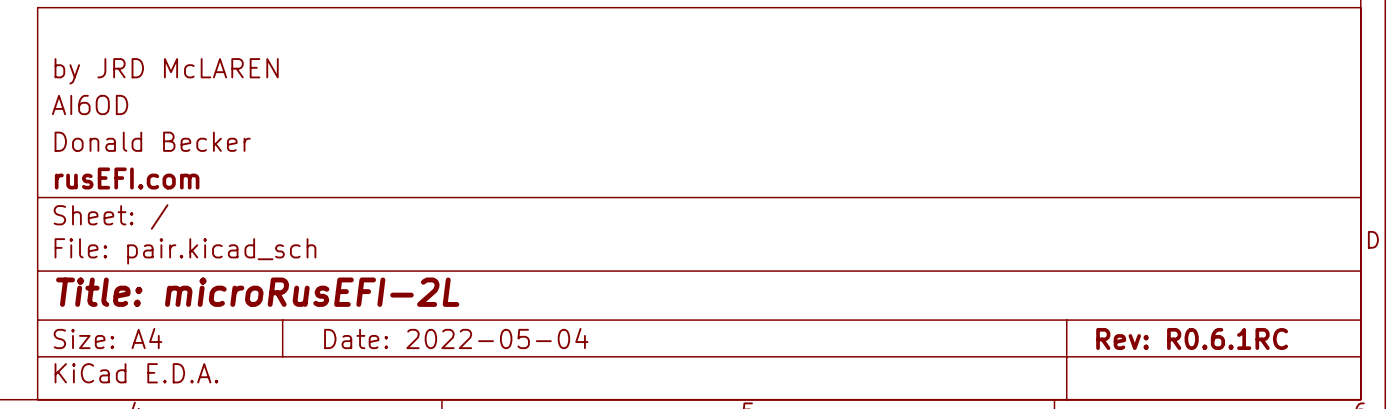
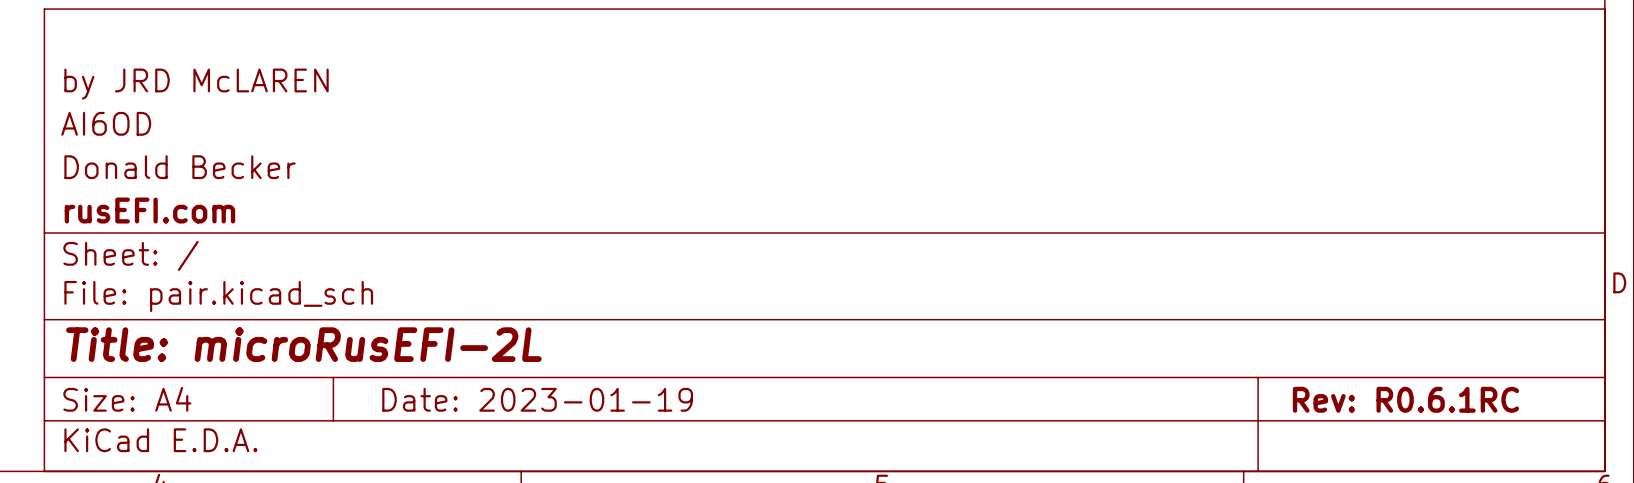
title block: Date: 2022-05-04 (456, 338) -> Date: 2023-01-19 (537, 399)

